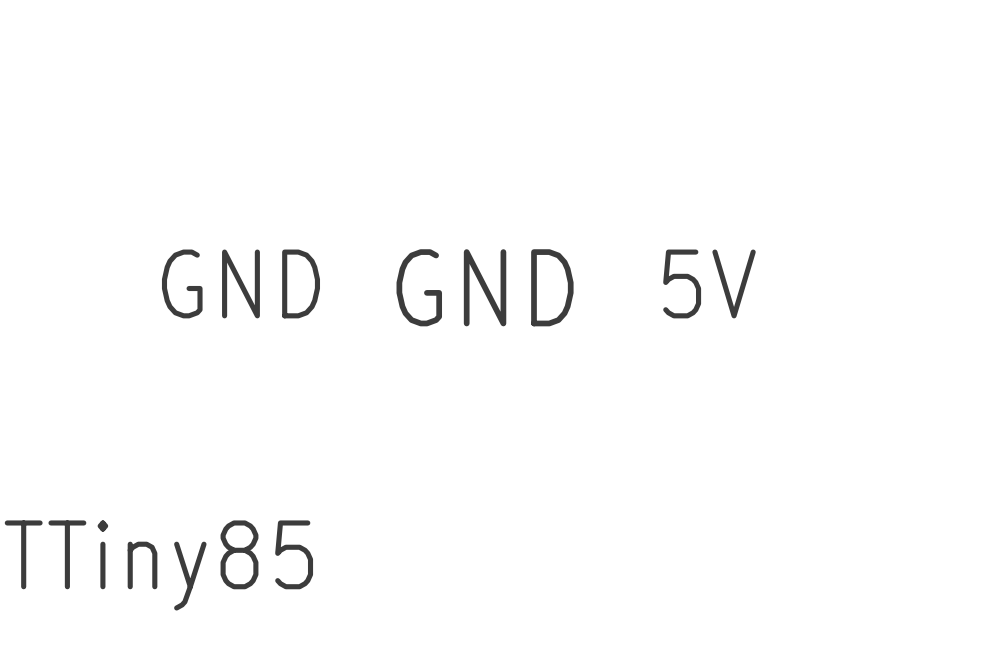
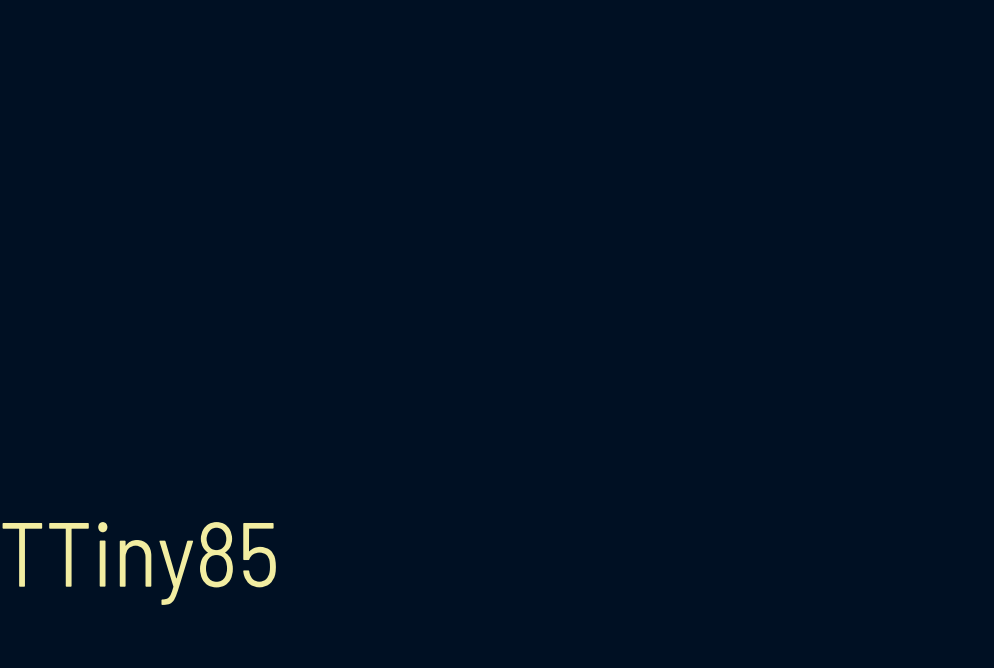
text: GND (240, 283) -> none
text: 5V (709, 283) -> none
text: GND (485, 287) -> none

